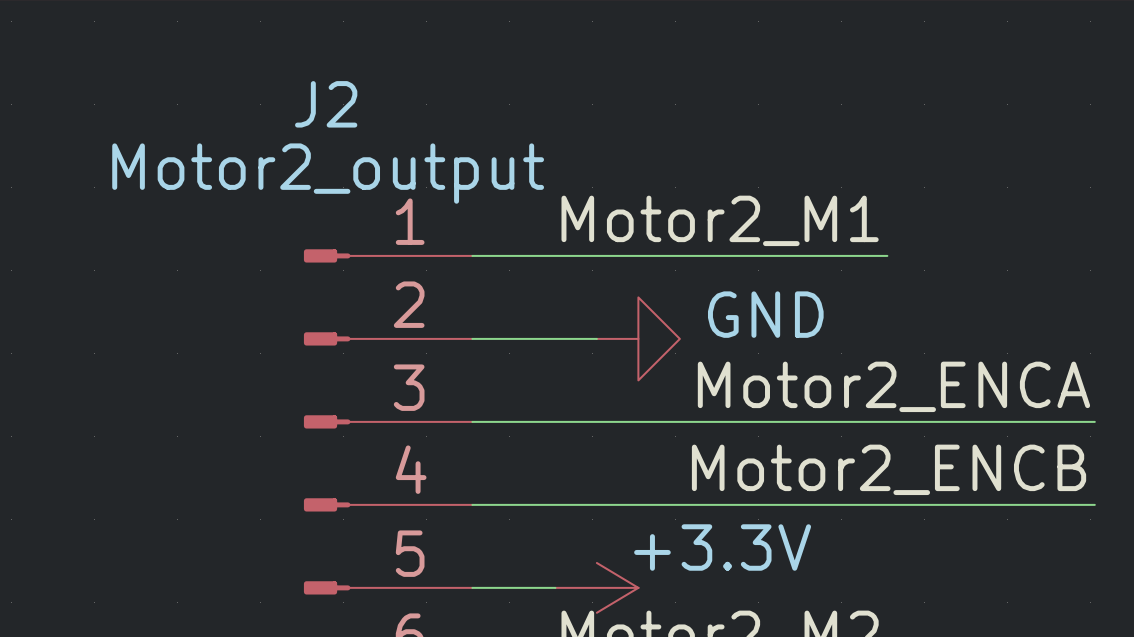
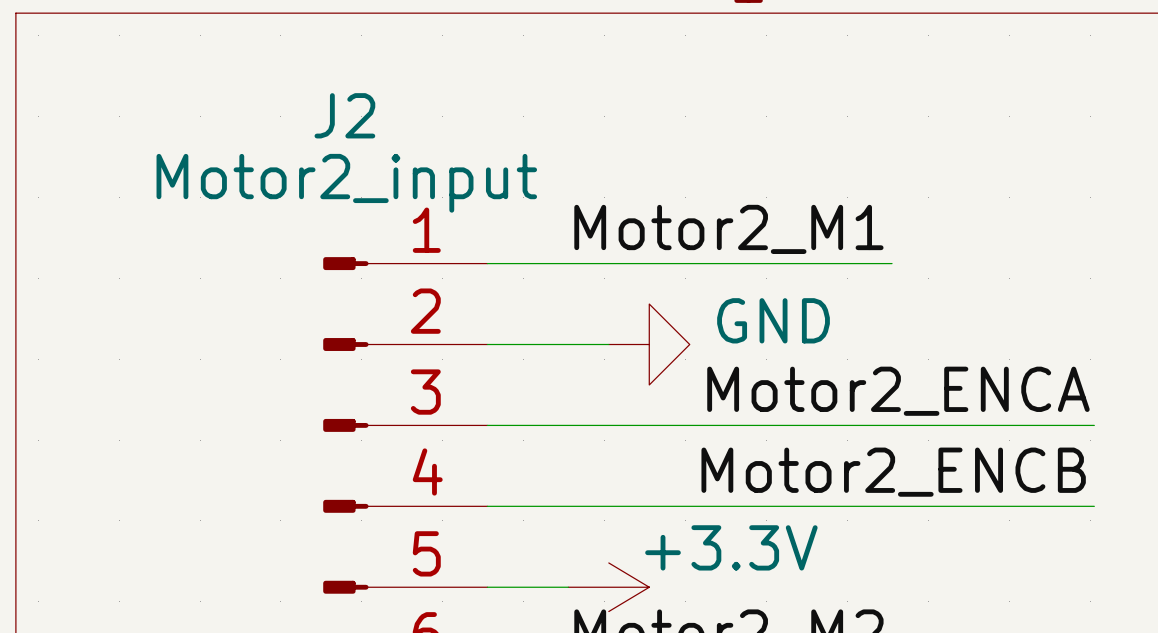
J2 value: Motor2_output (328, 173) -> Motor2_input (346, 183)

